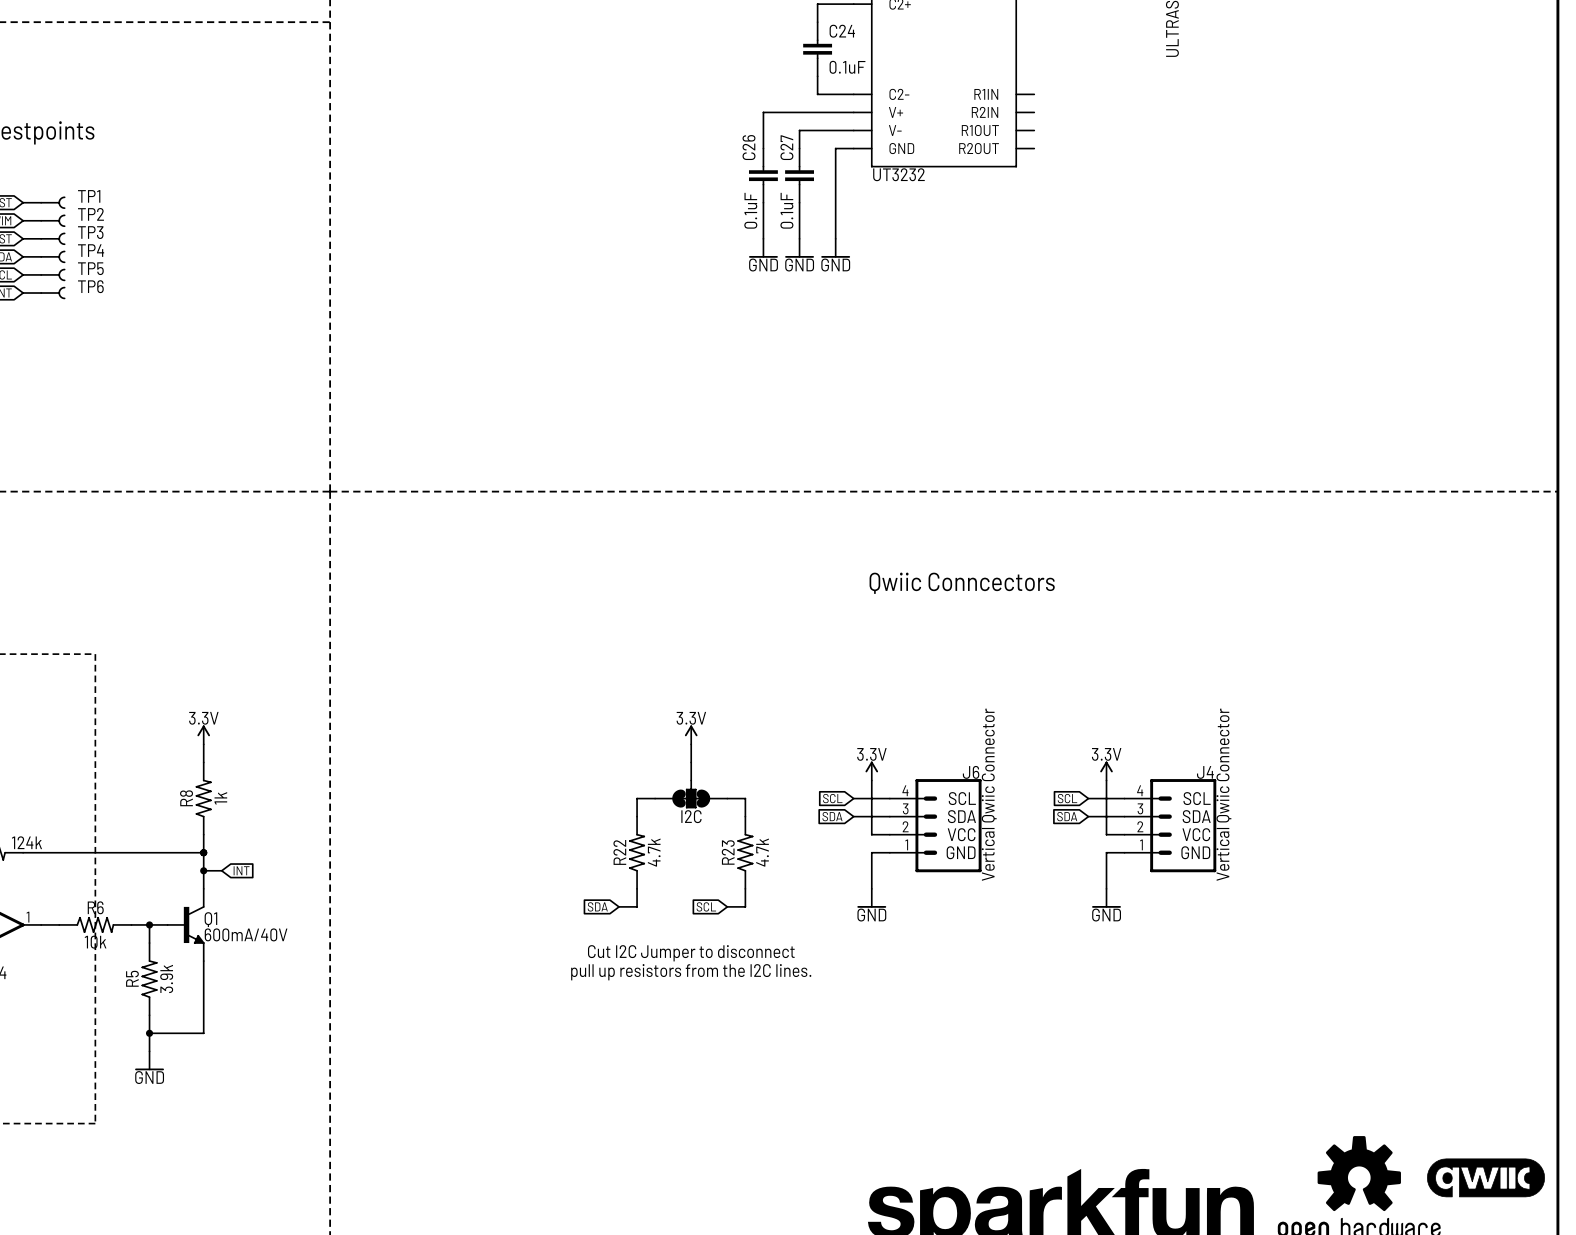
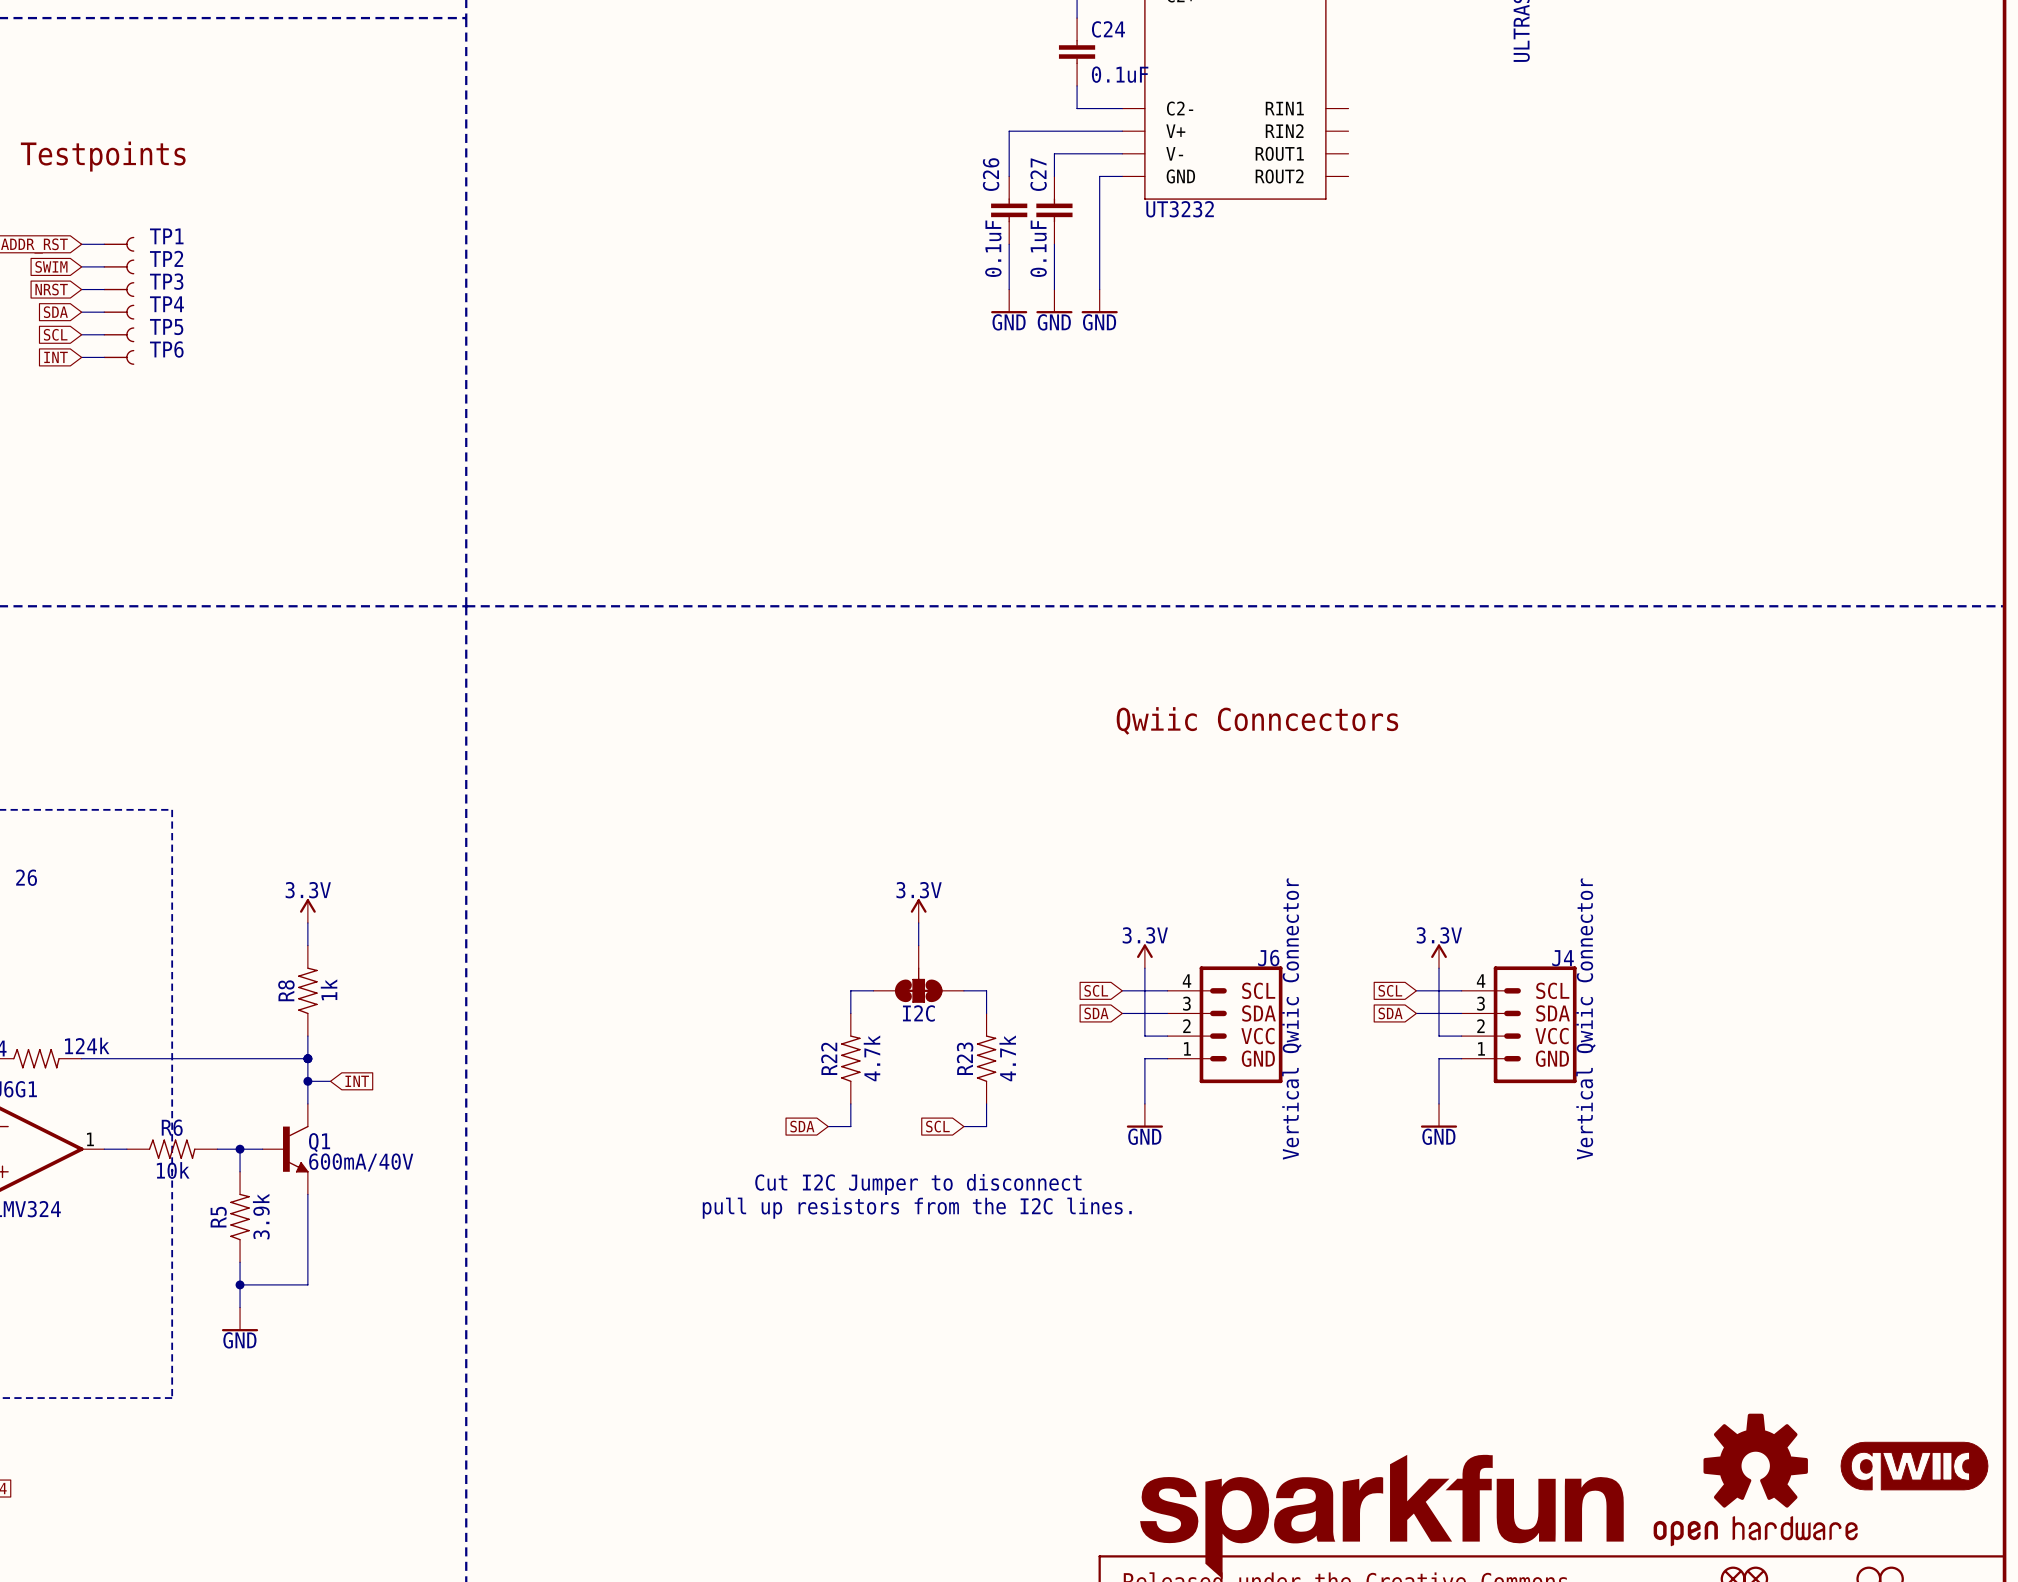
part pin name: R1IN (986, 94) -> RIN1 (1284, 108)
part pin name: R2IN (985, 112) -> RIN2 (1284, 131)
part pin name: R1OUT (980, 130) -> ROUT1 (1279, 153)
part pin name: R2OUT (979, 148) -> ROUT2 (1279, 176)

